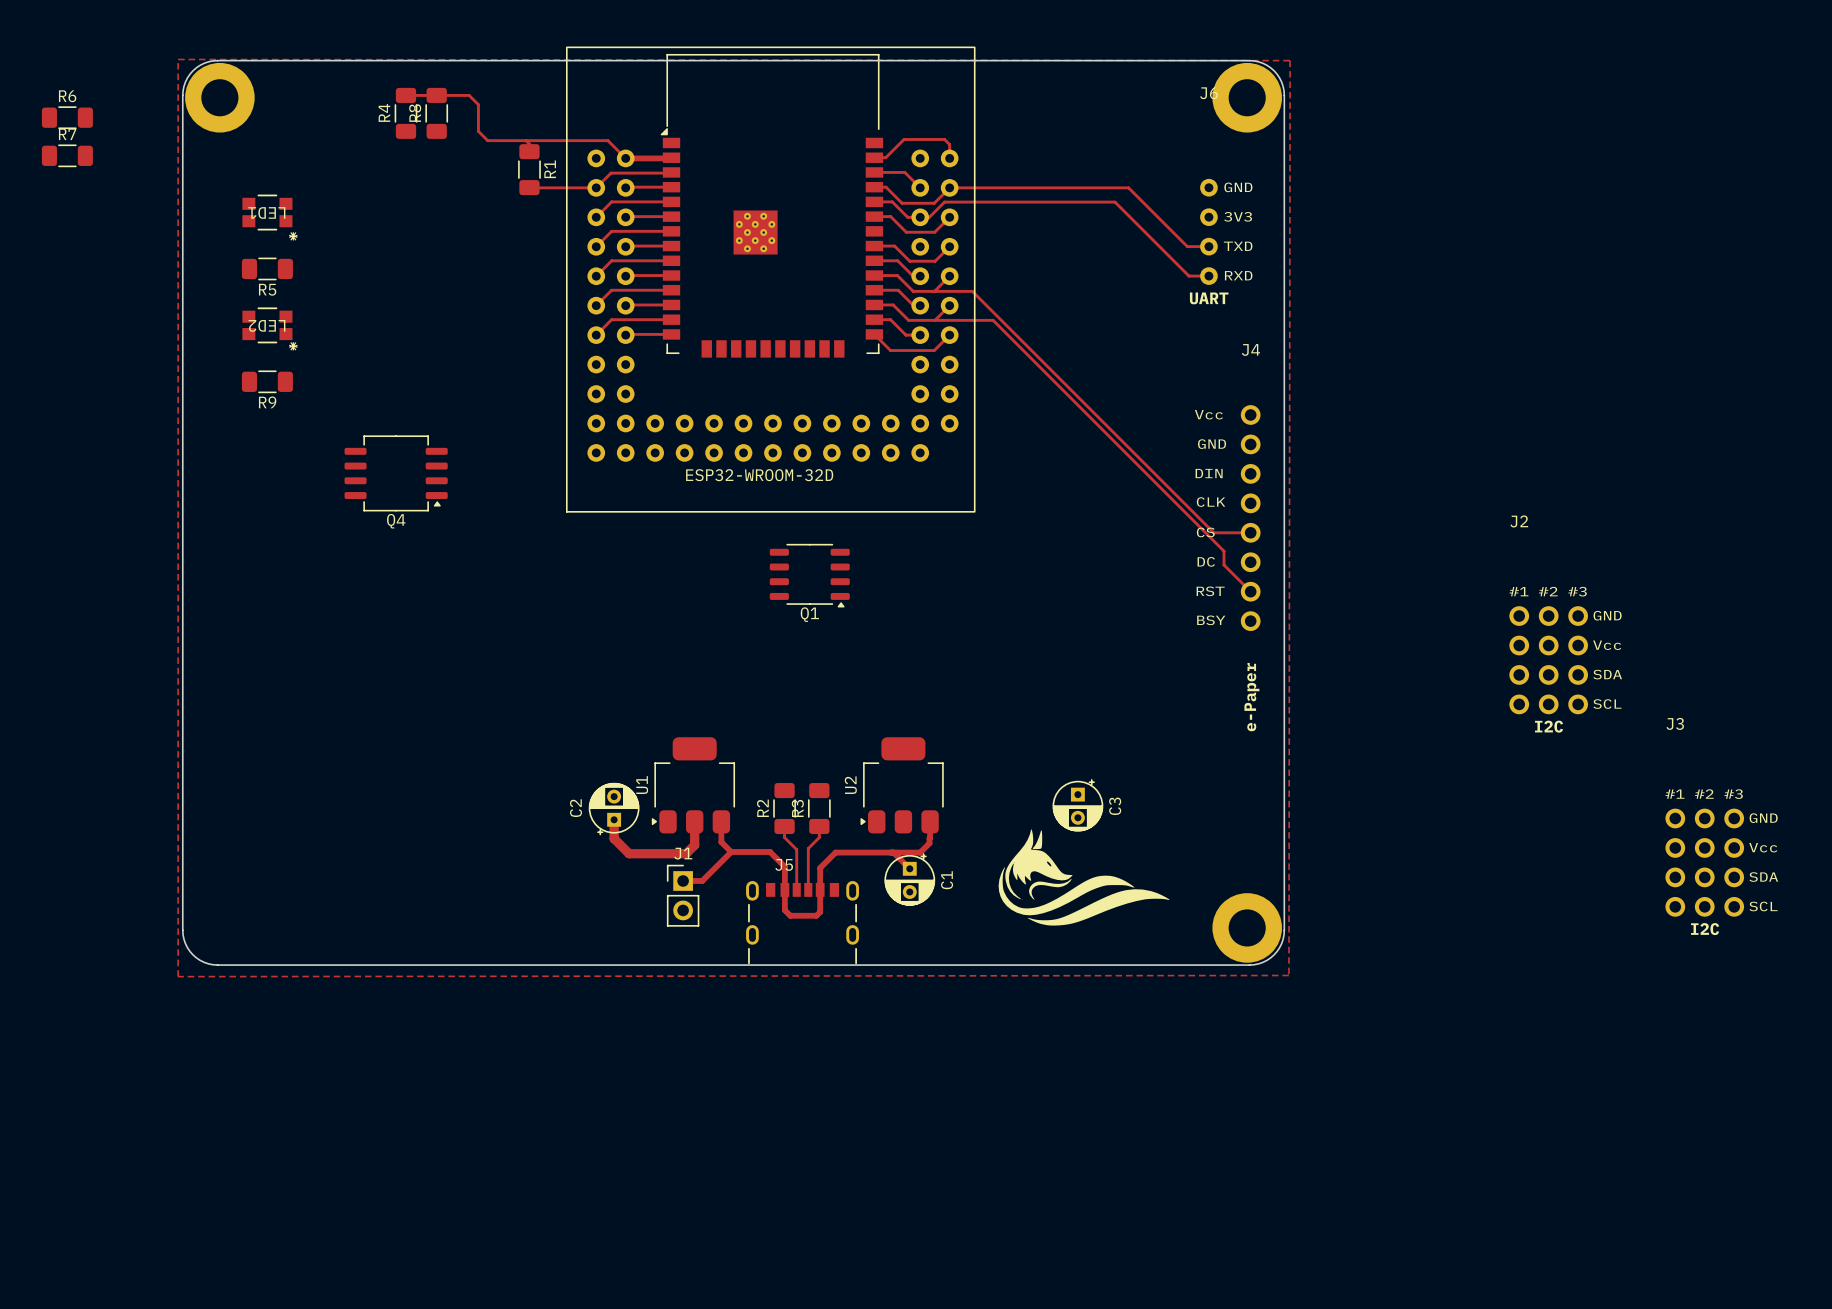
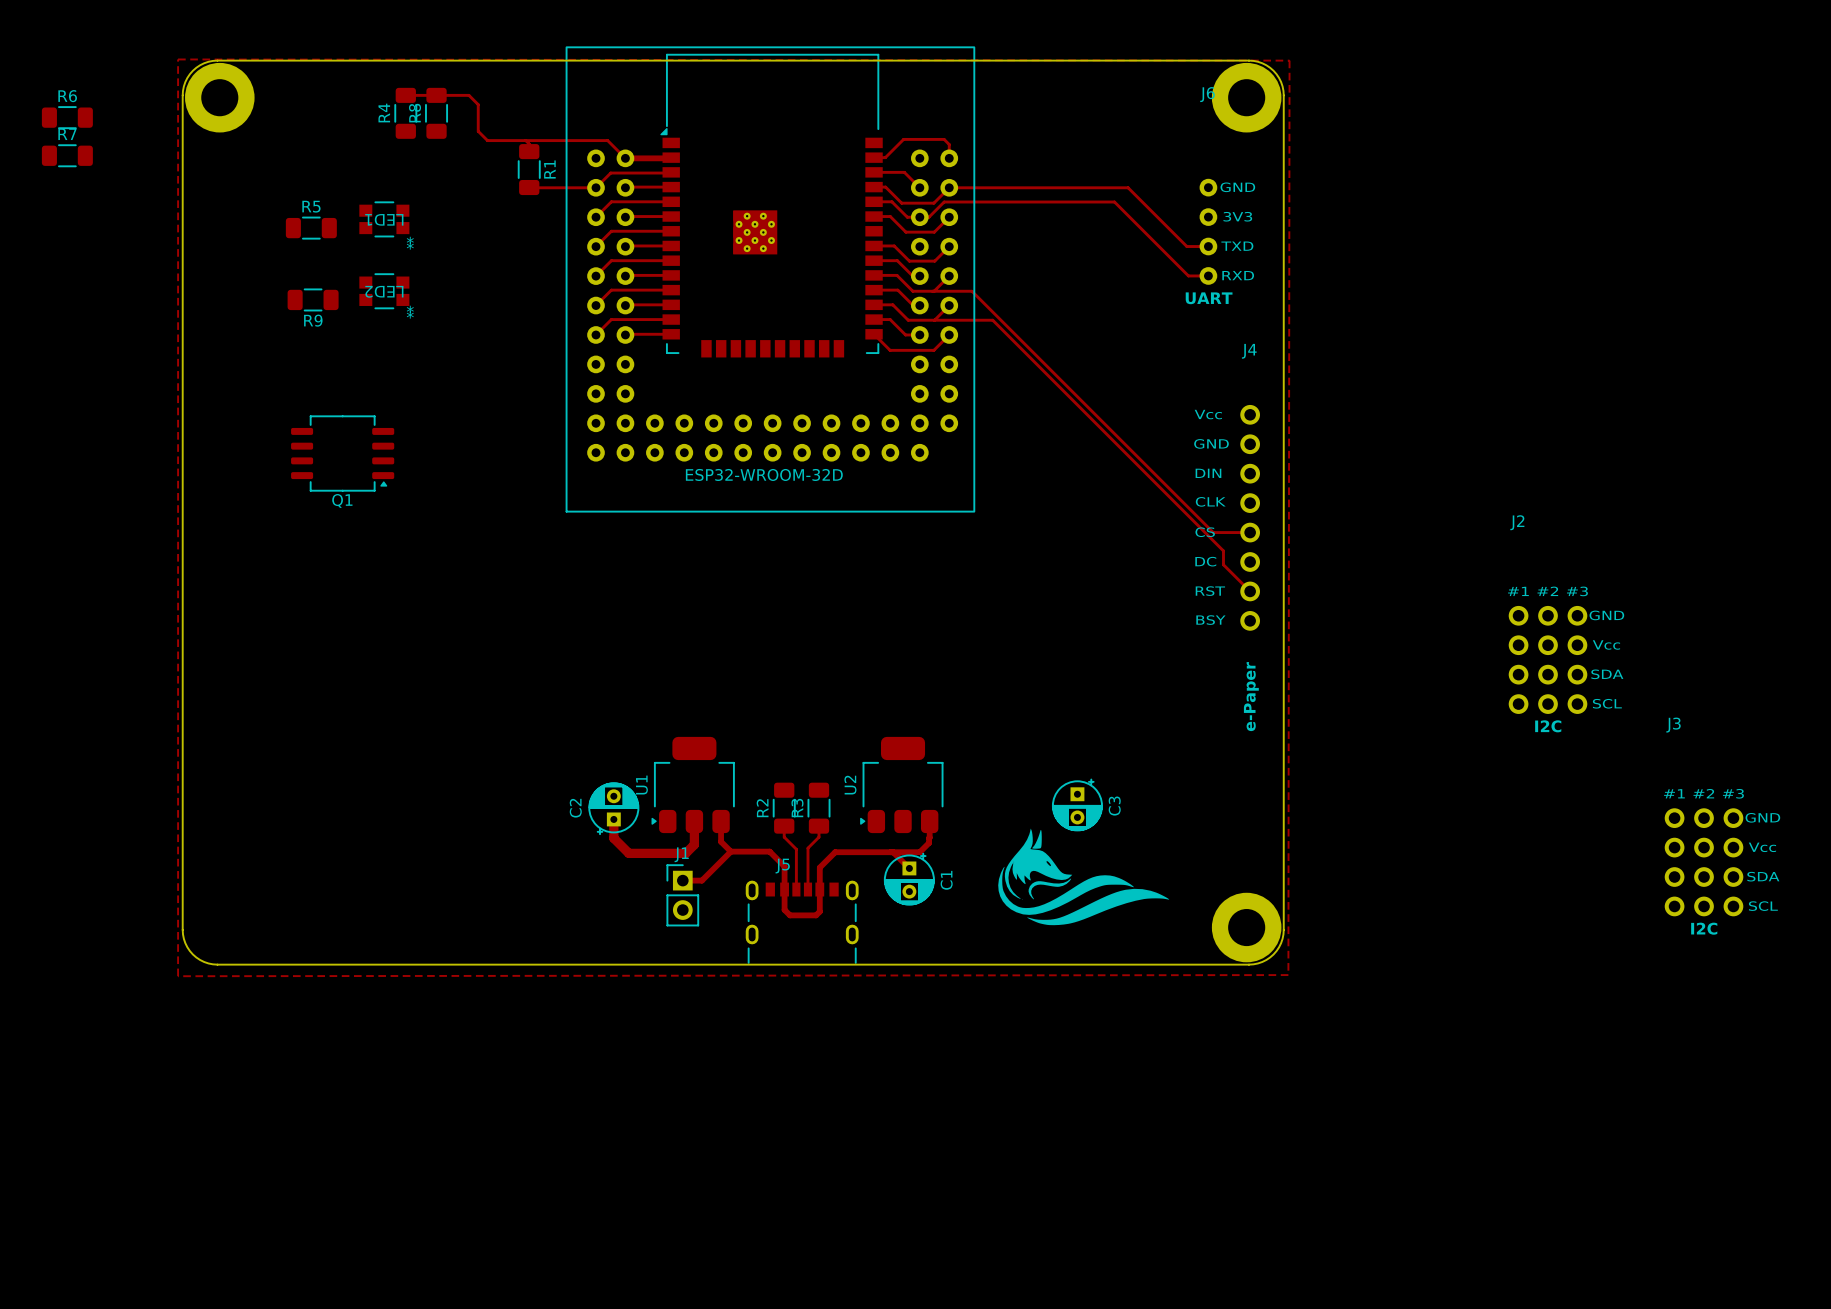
LED1 position: (267, 212) -> (384, 219)
R5 position: (267, 268) -> (311, 228)
R5 name position: R5 (267, 289) -> R5 (311, 206)
LED2 position: (267, 325) -> (384, 291)
R9 position: (267, 381) -> (313, 299)
Q4: (396, 473) -> none
Q1 footprint: [769, 543, 850, 608] -> [291, 415, 395, 492]

